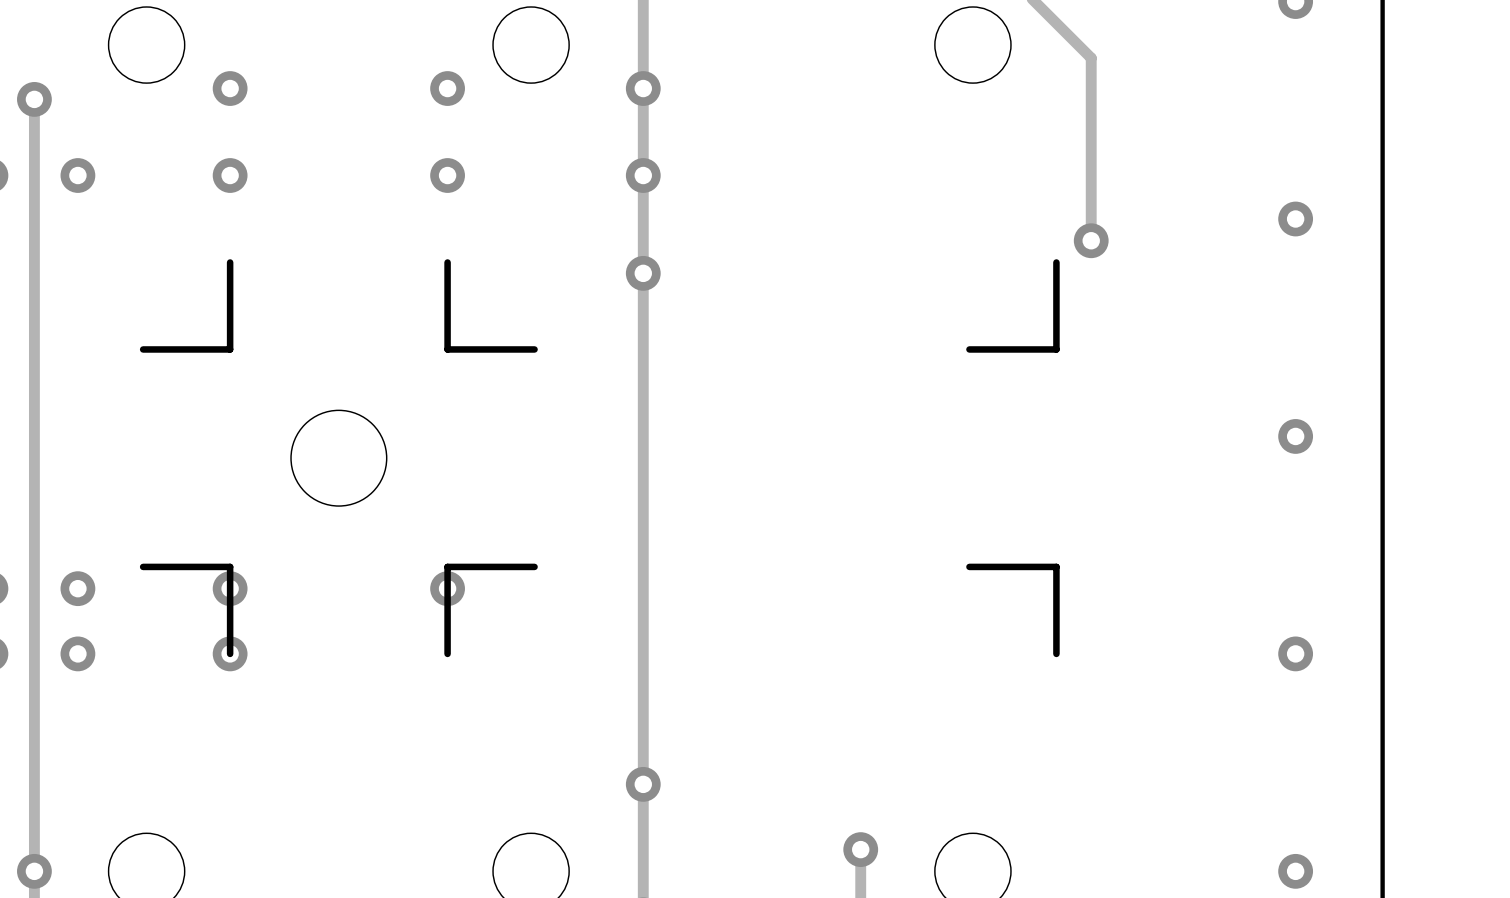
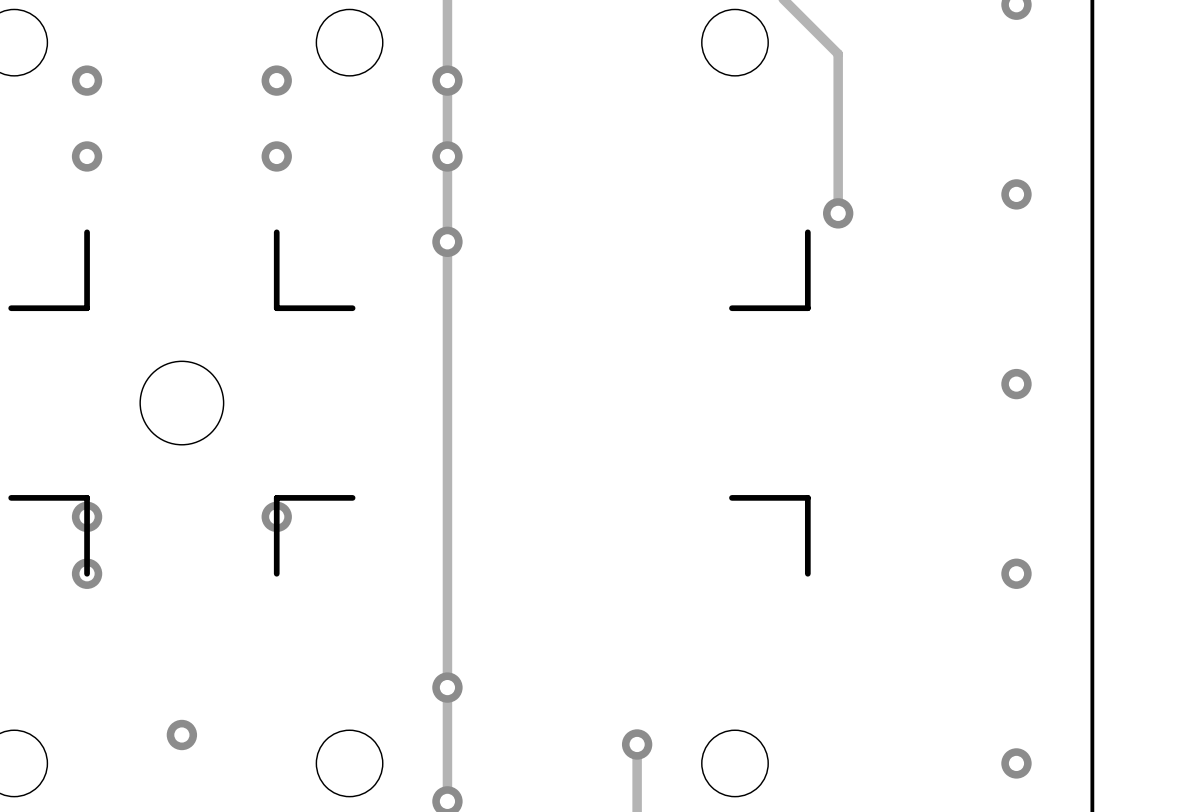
via: none -> (181, 734)

